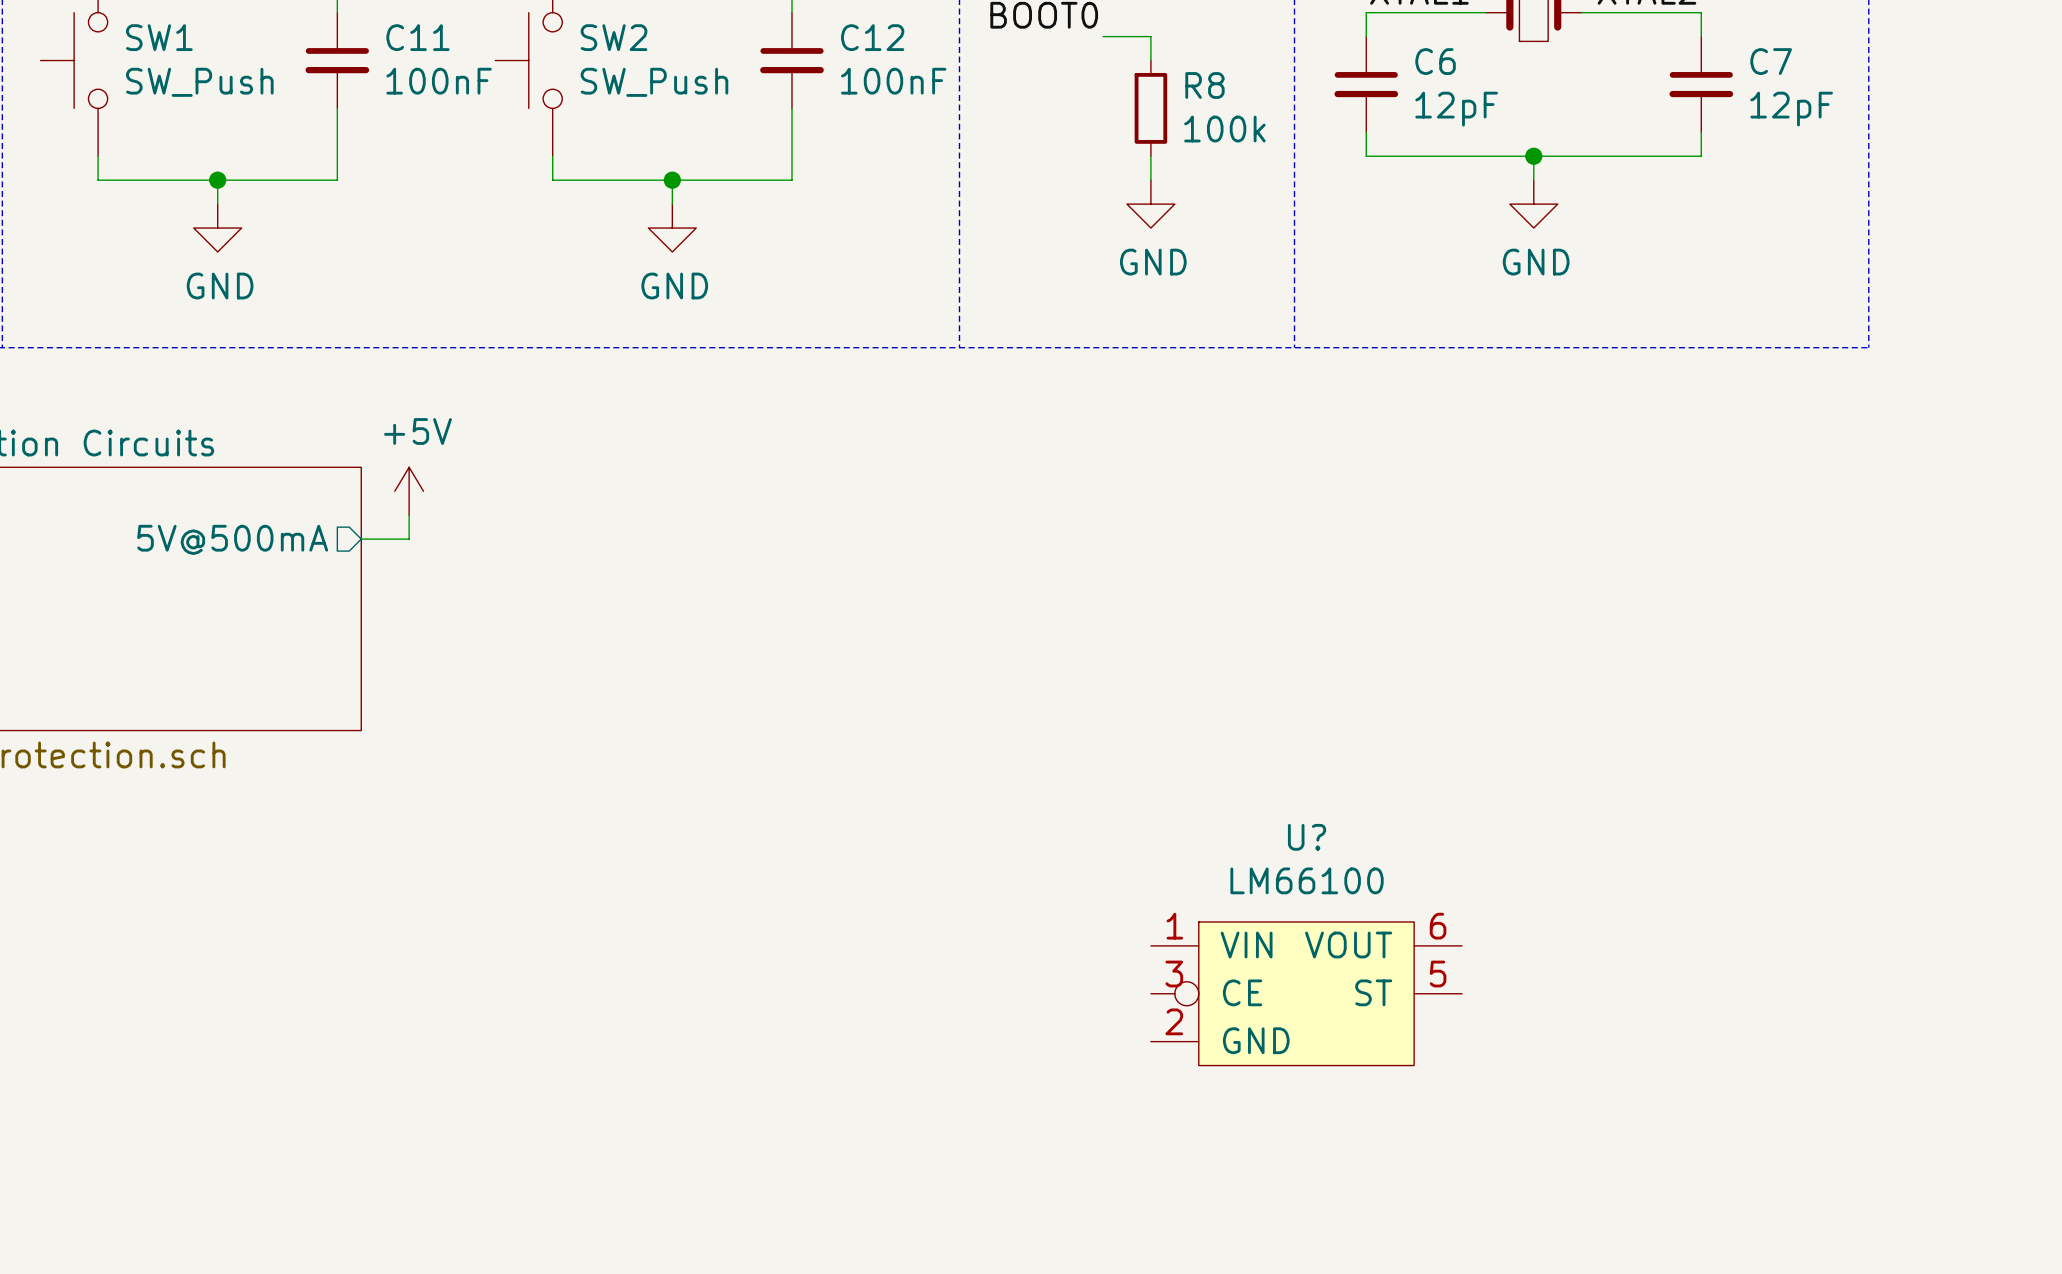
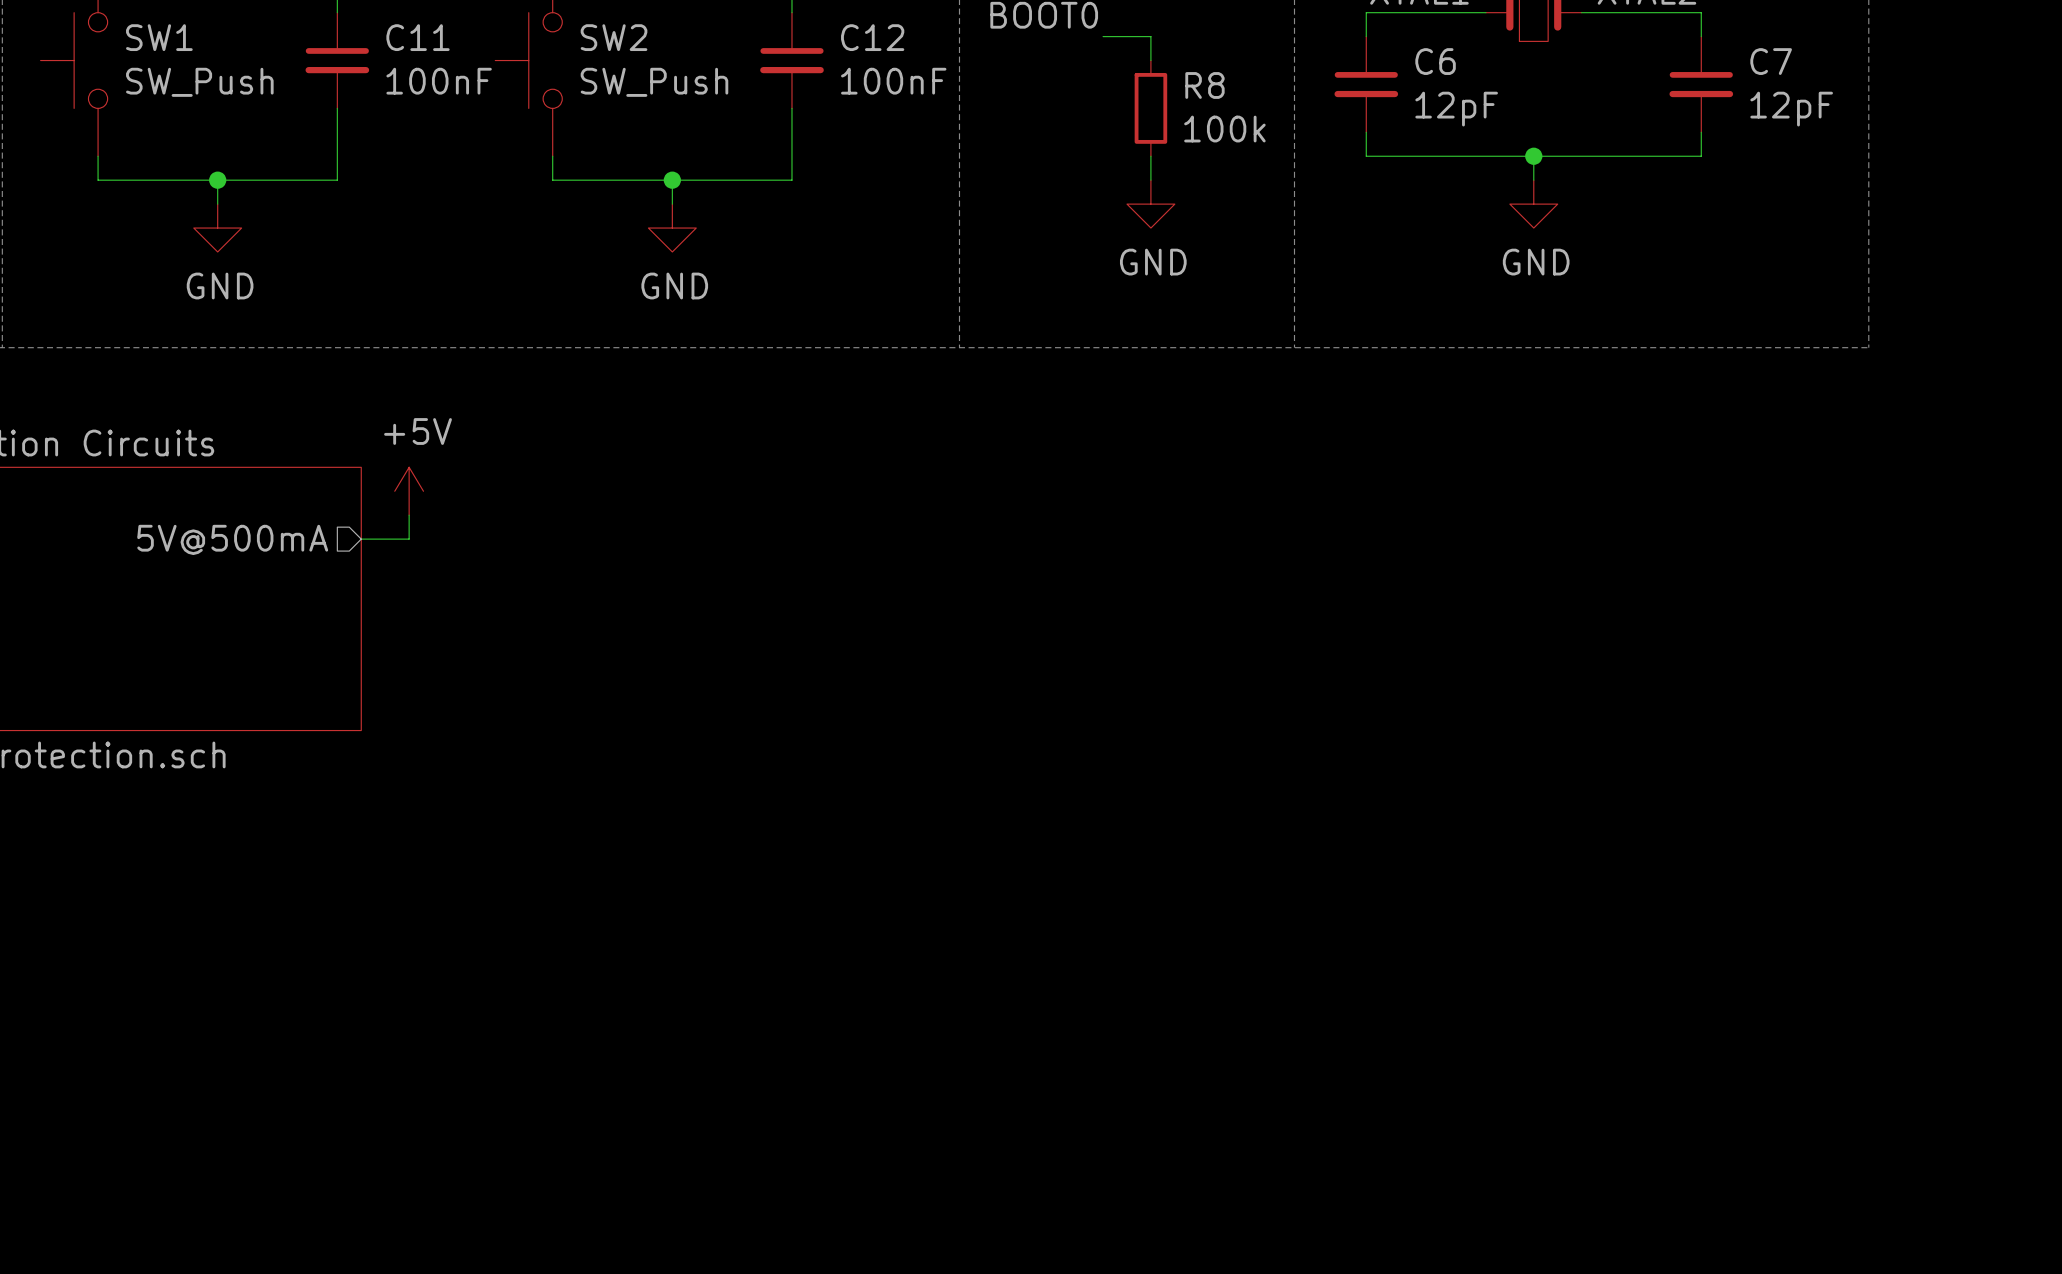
U?: LM66100 (1306, 993) -> none

